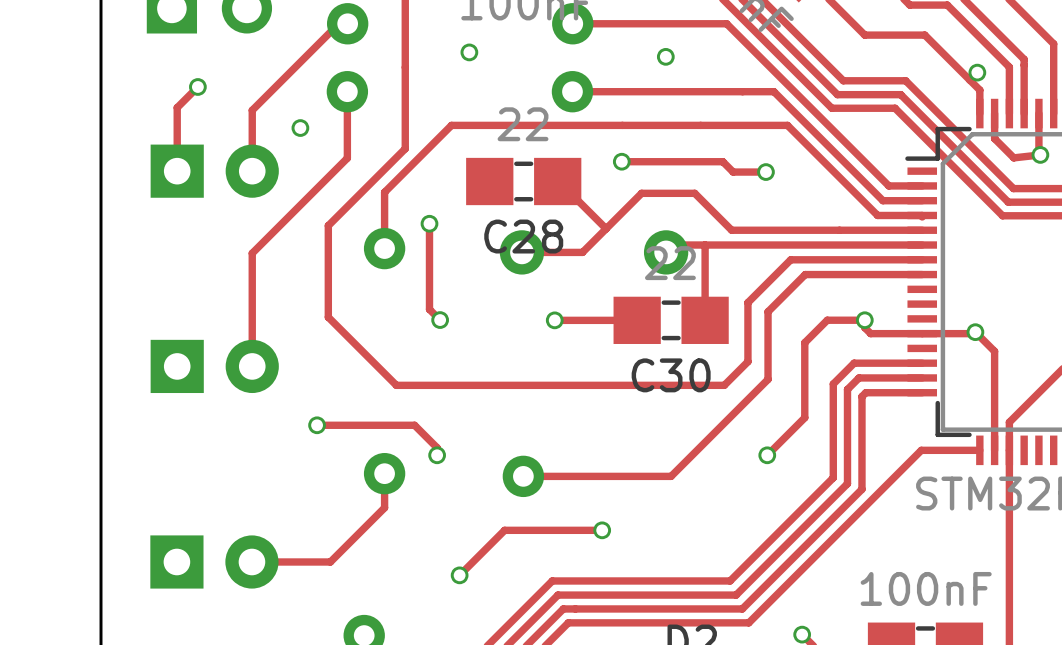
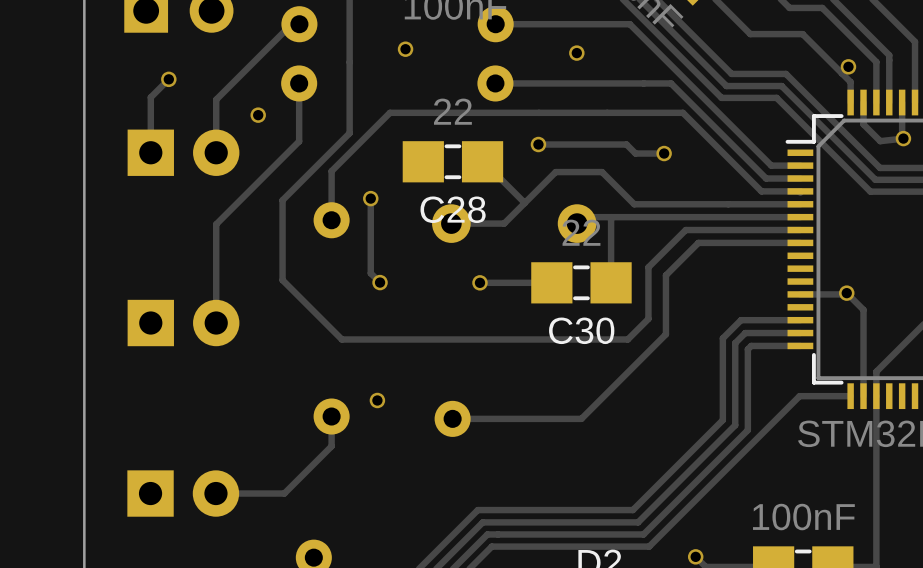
via: (864, 320) -> none
track: (922, 333) (870, 333) (864, 327) (864, 320) (827, 320) (804, 342) (804, 417) (767, 455) -> none
track: (317, 425) (414, 425) (437, 447) (437, 455) -> none
via: (317, 425) -> none
via: (767, 455) -> none
track: (602, 530) (504, 530) (459, 575) -> none
via: (602, 530) -> none
via: (459, 575) -> none

